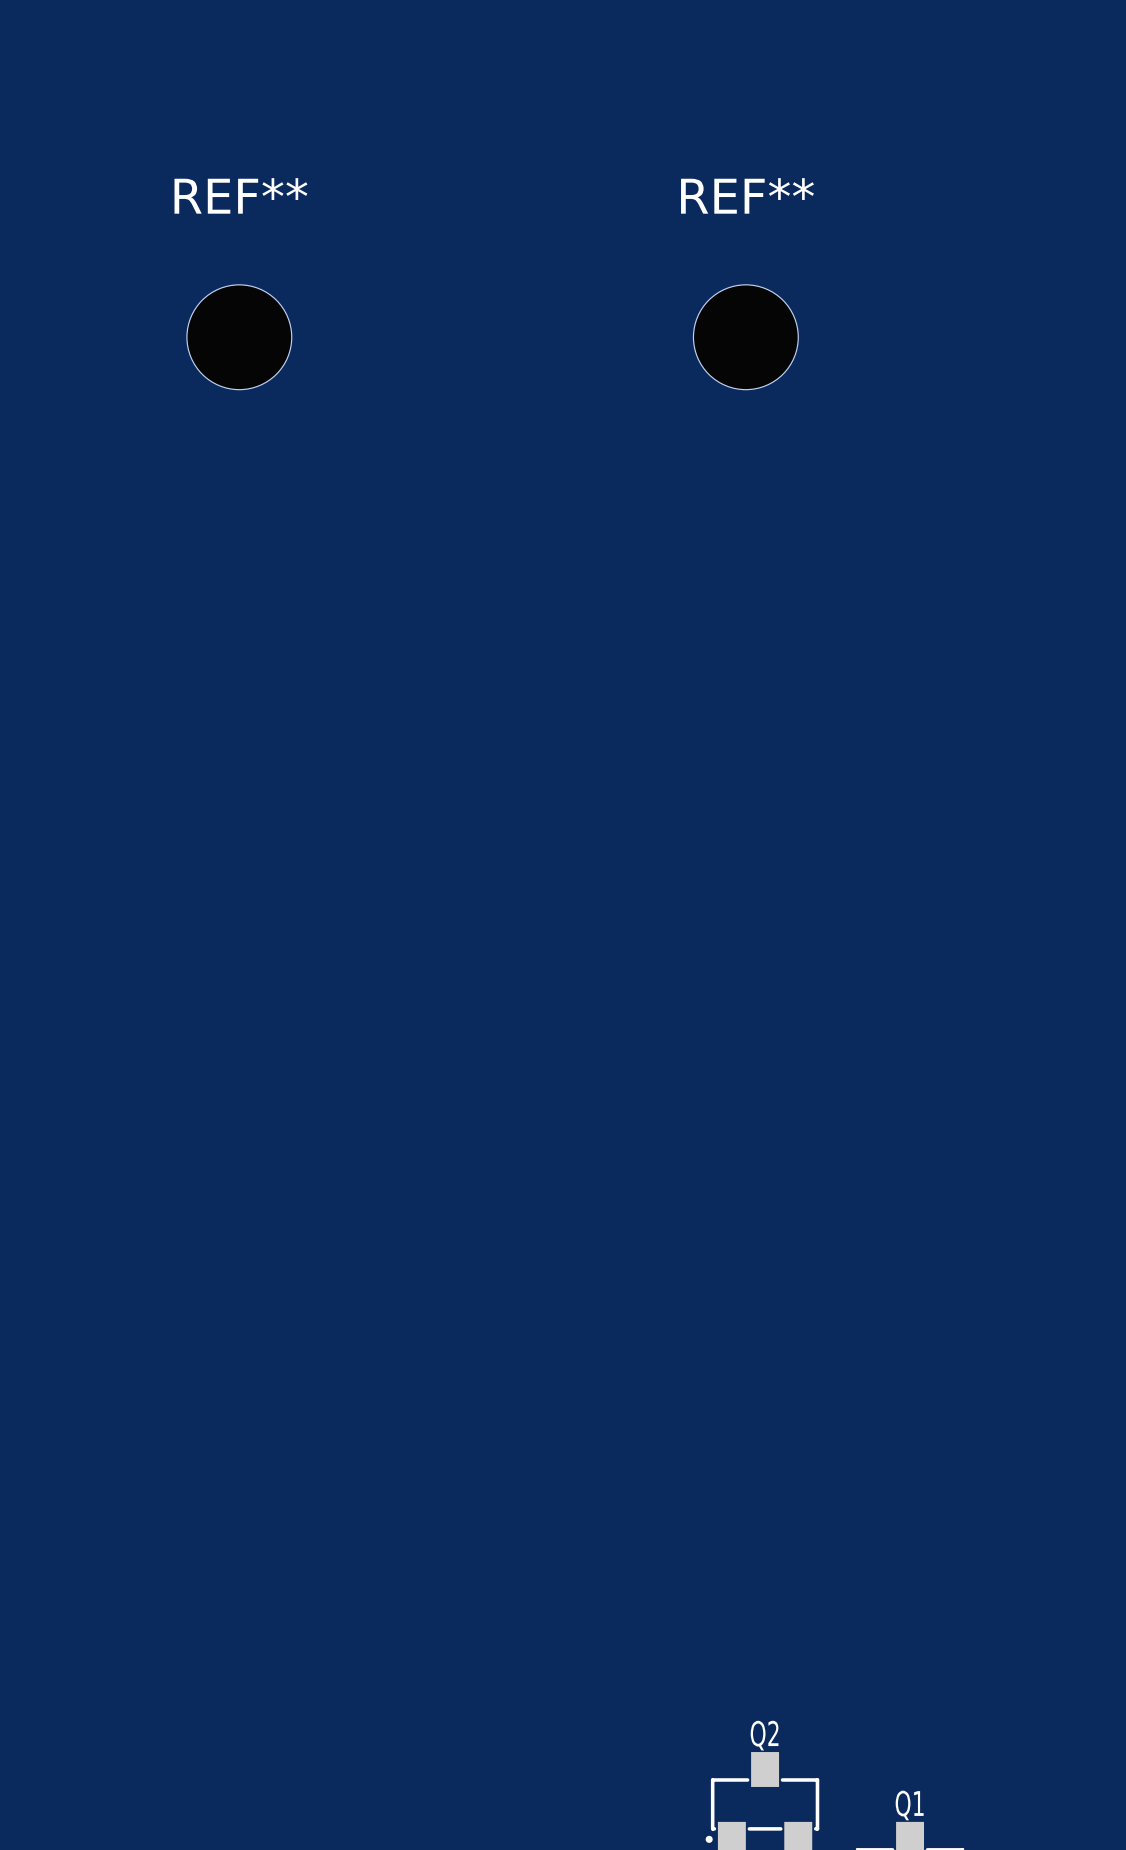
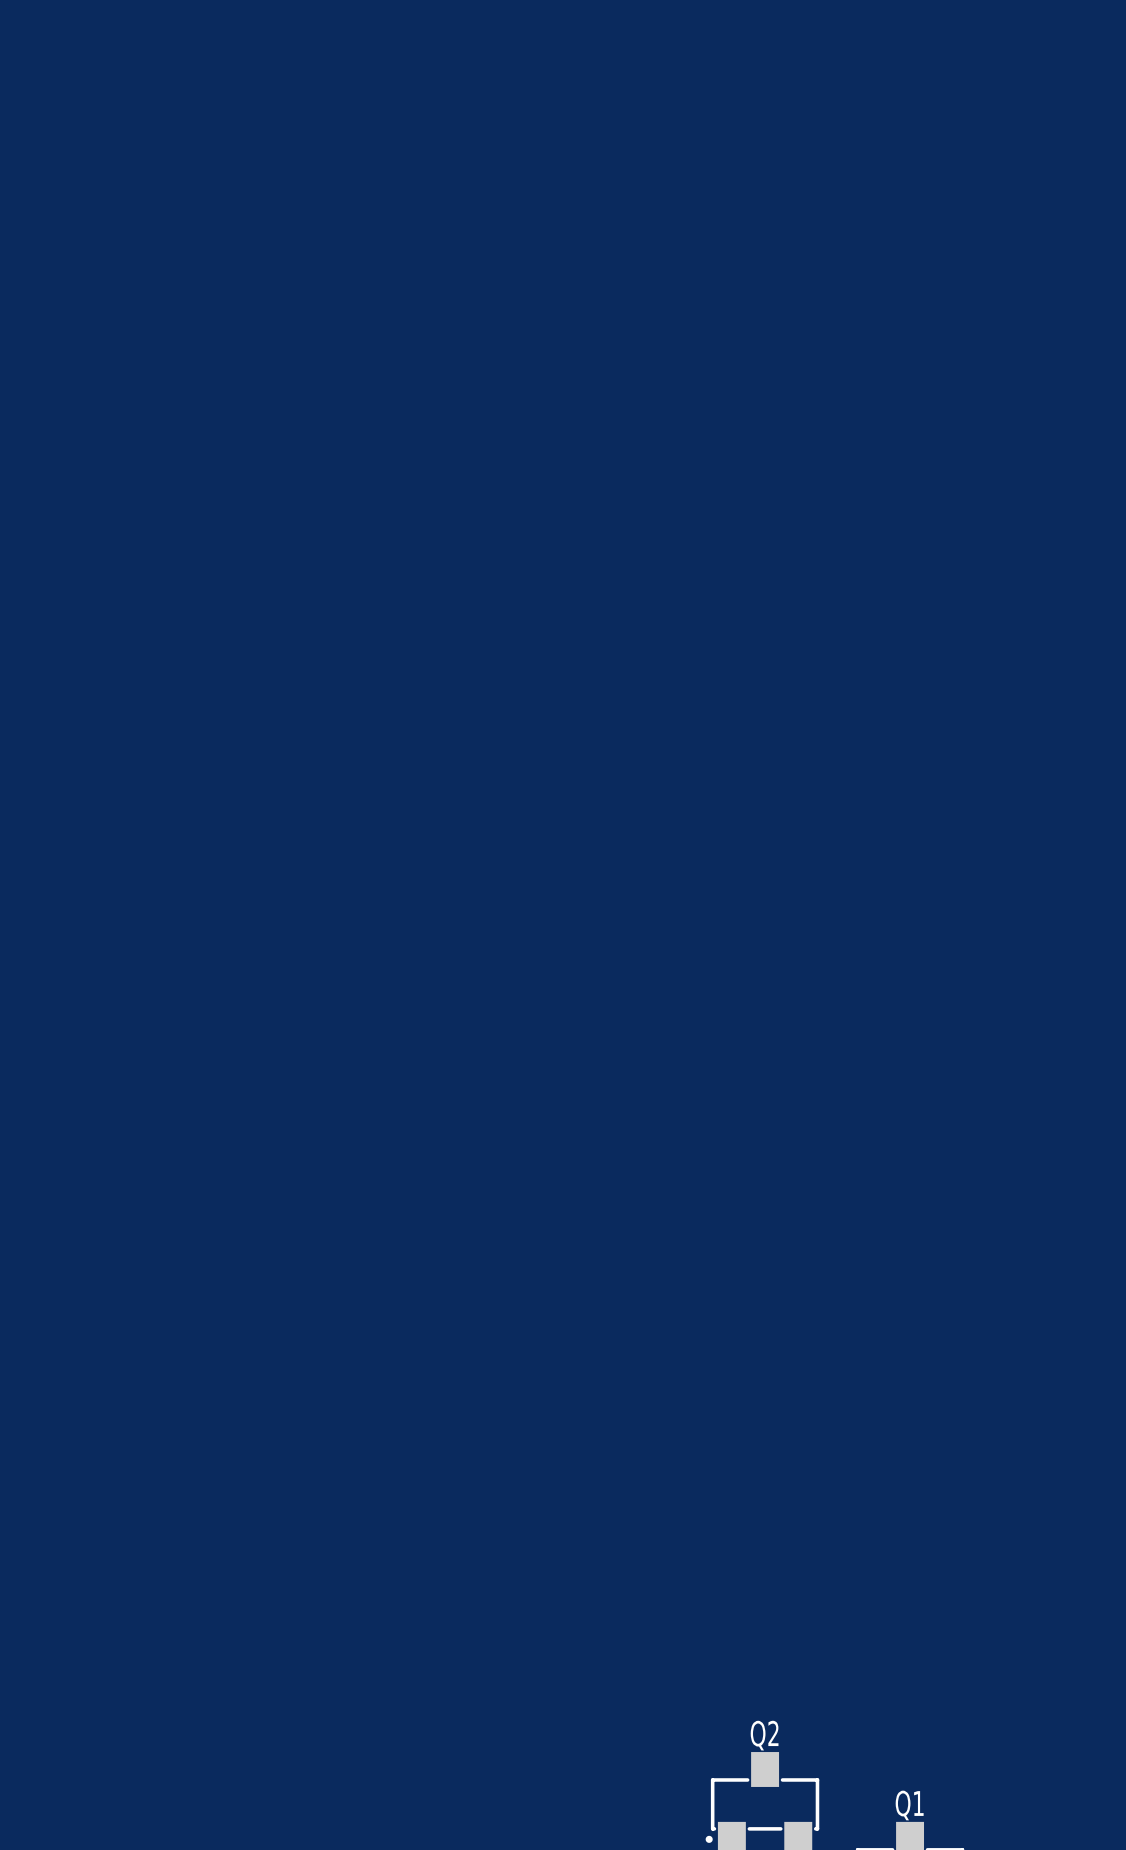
REF**: (239, 337) -> none
REF**: (745, 337) -> none

